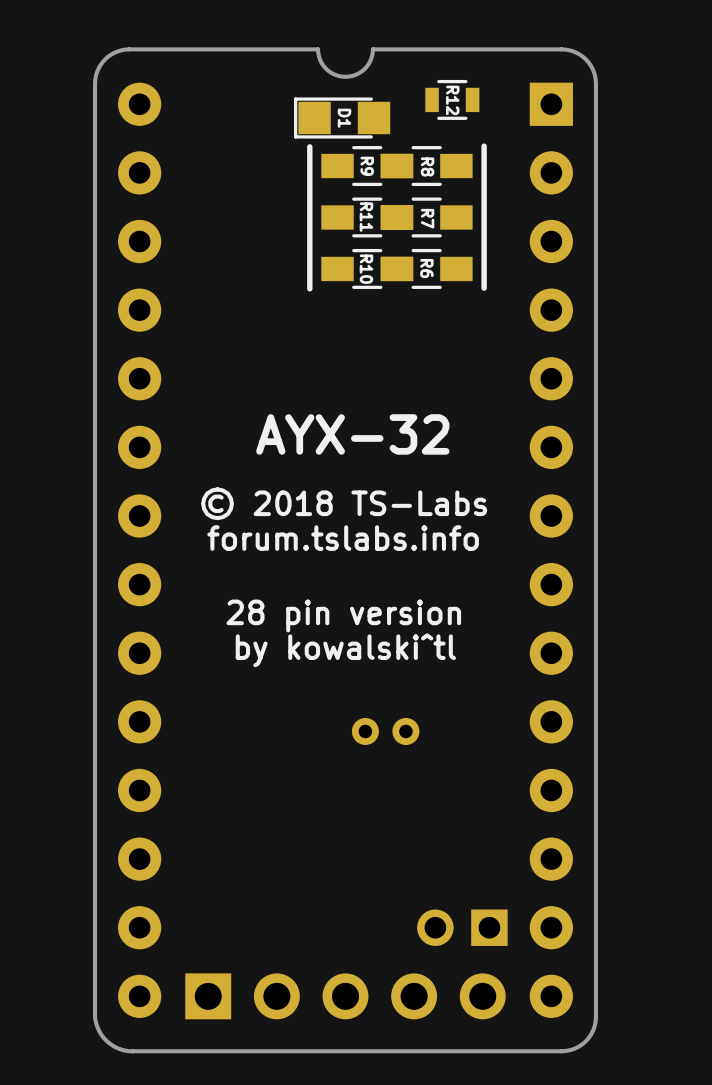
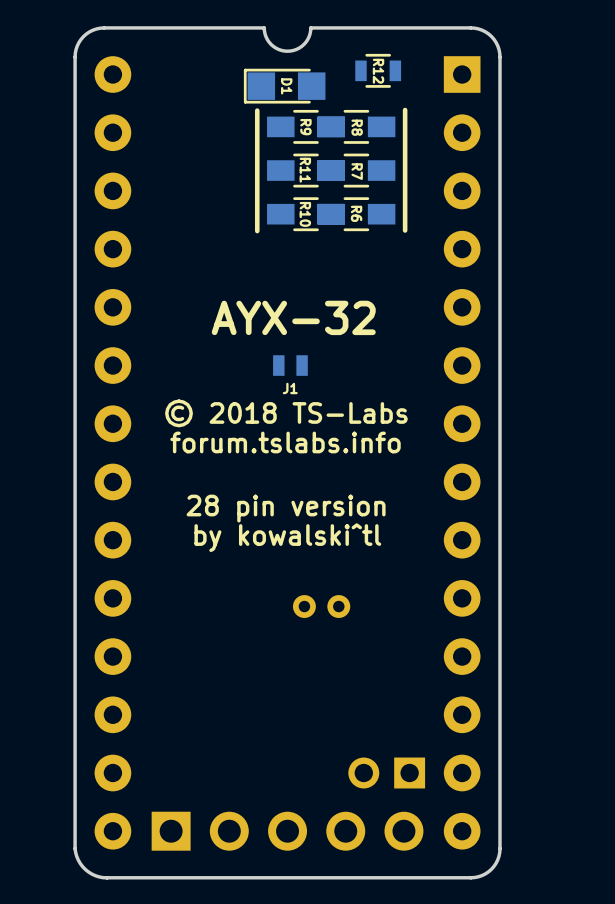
text position: AYX-32 (352, 434) -> AYX-32 (293, 317)
J1: none -> (290, 365)

